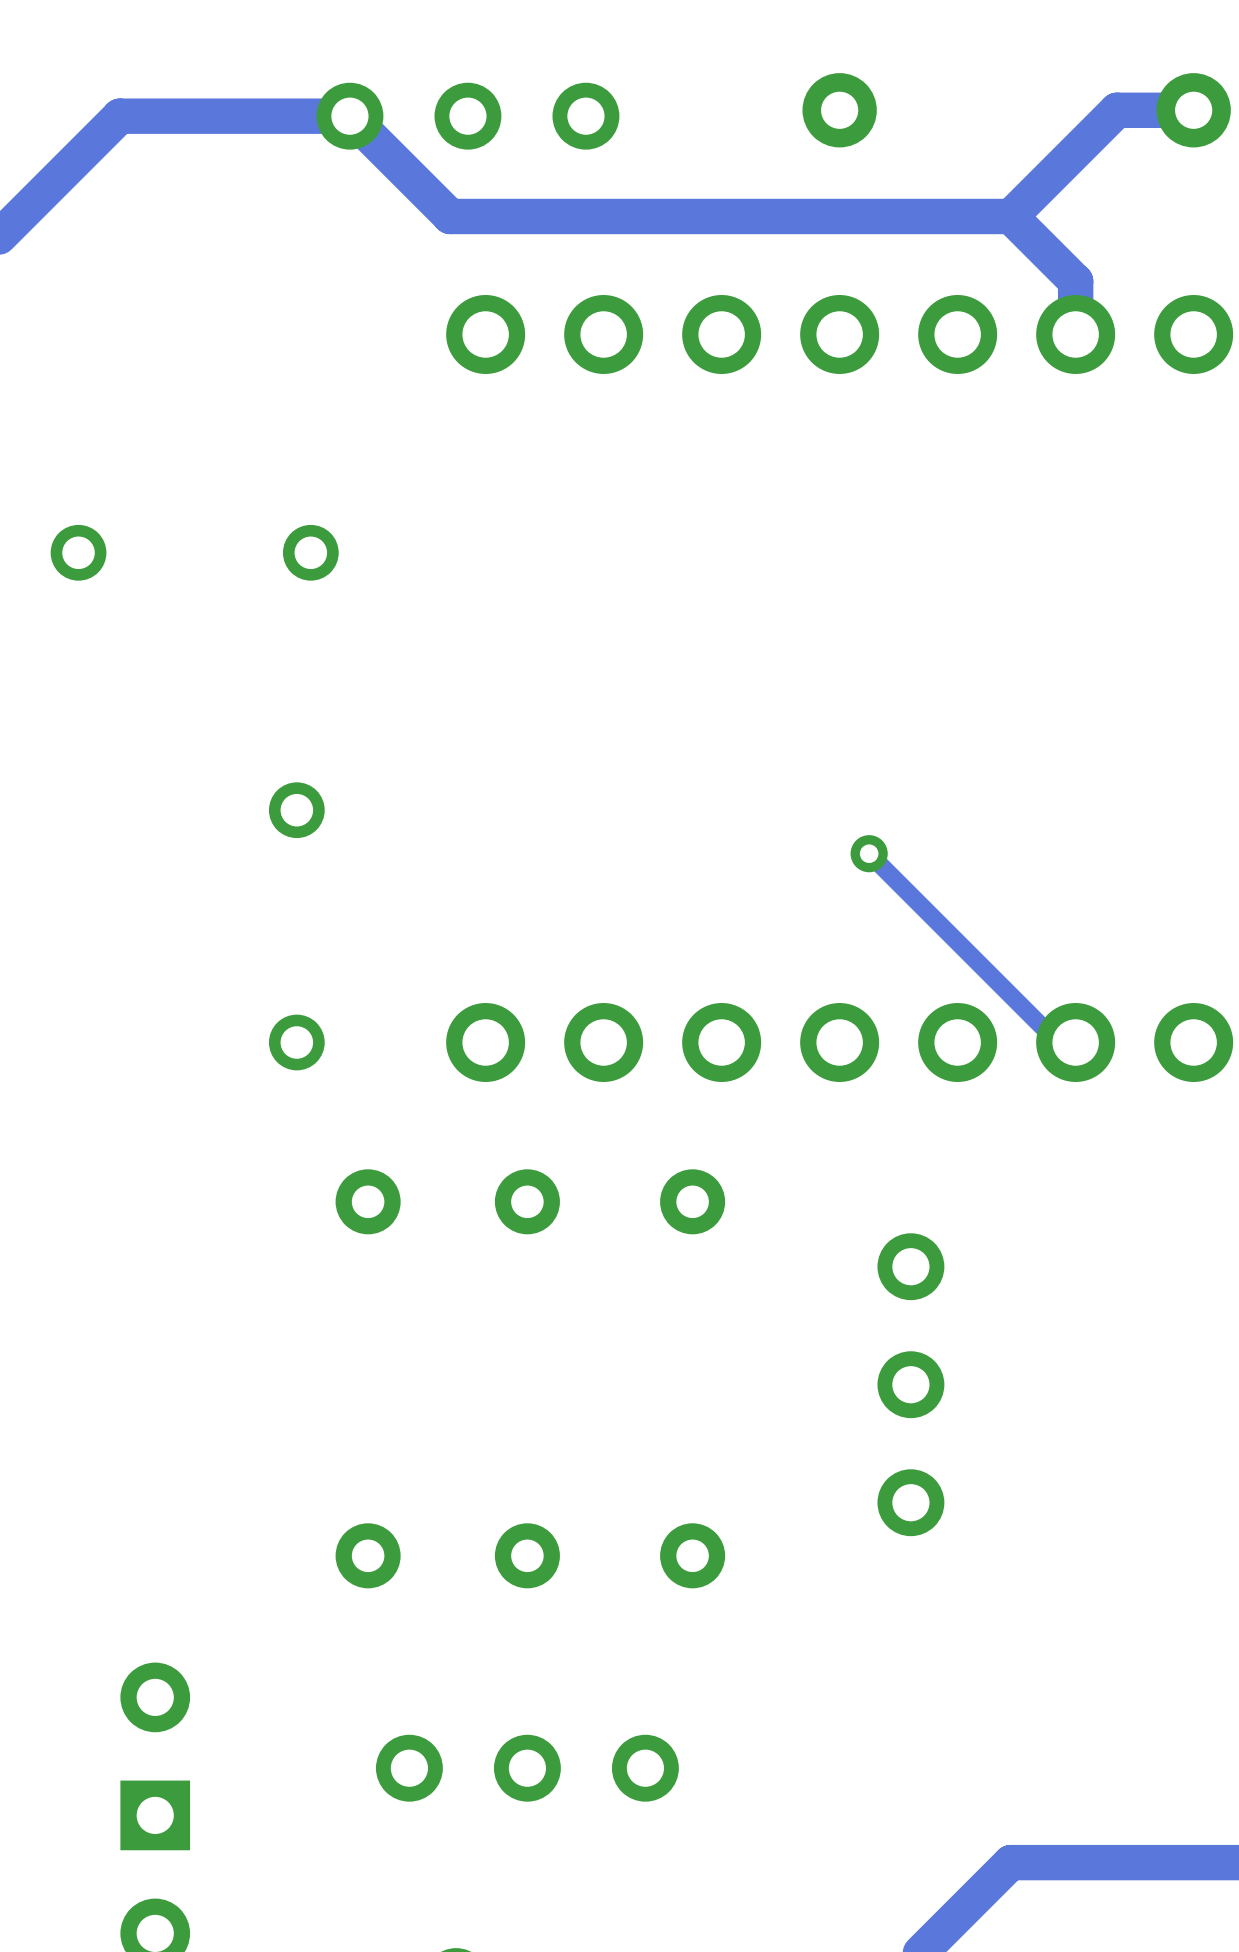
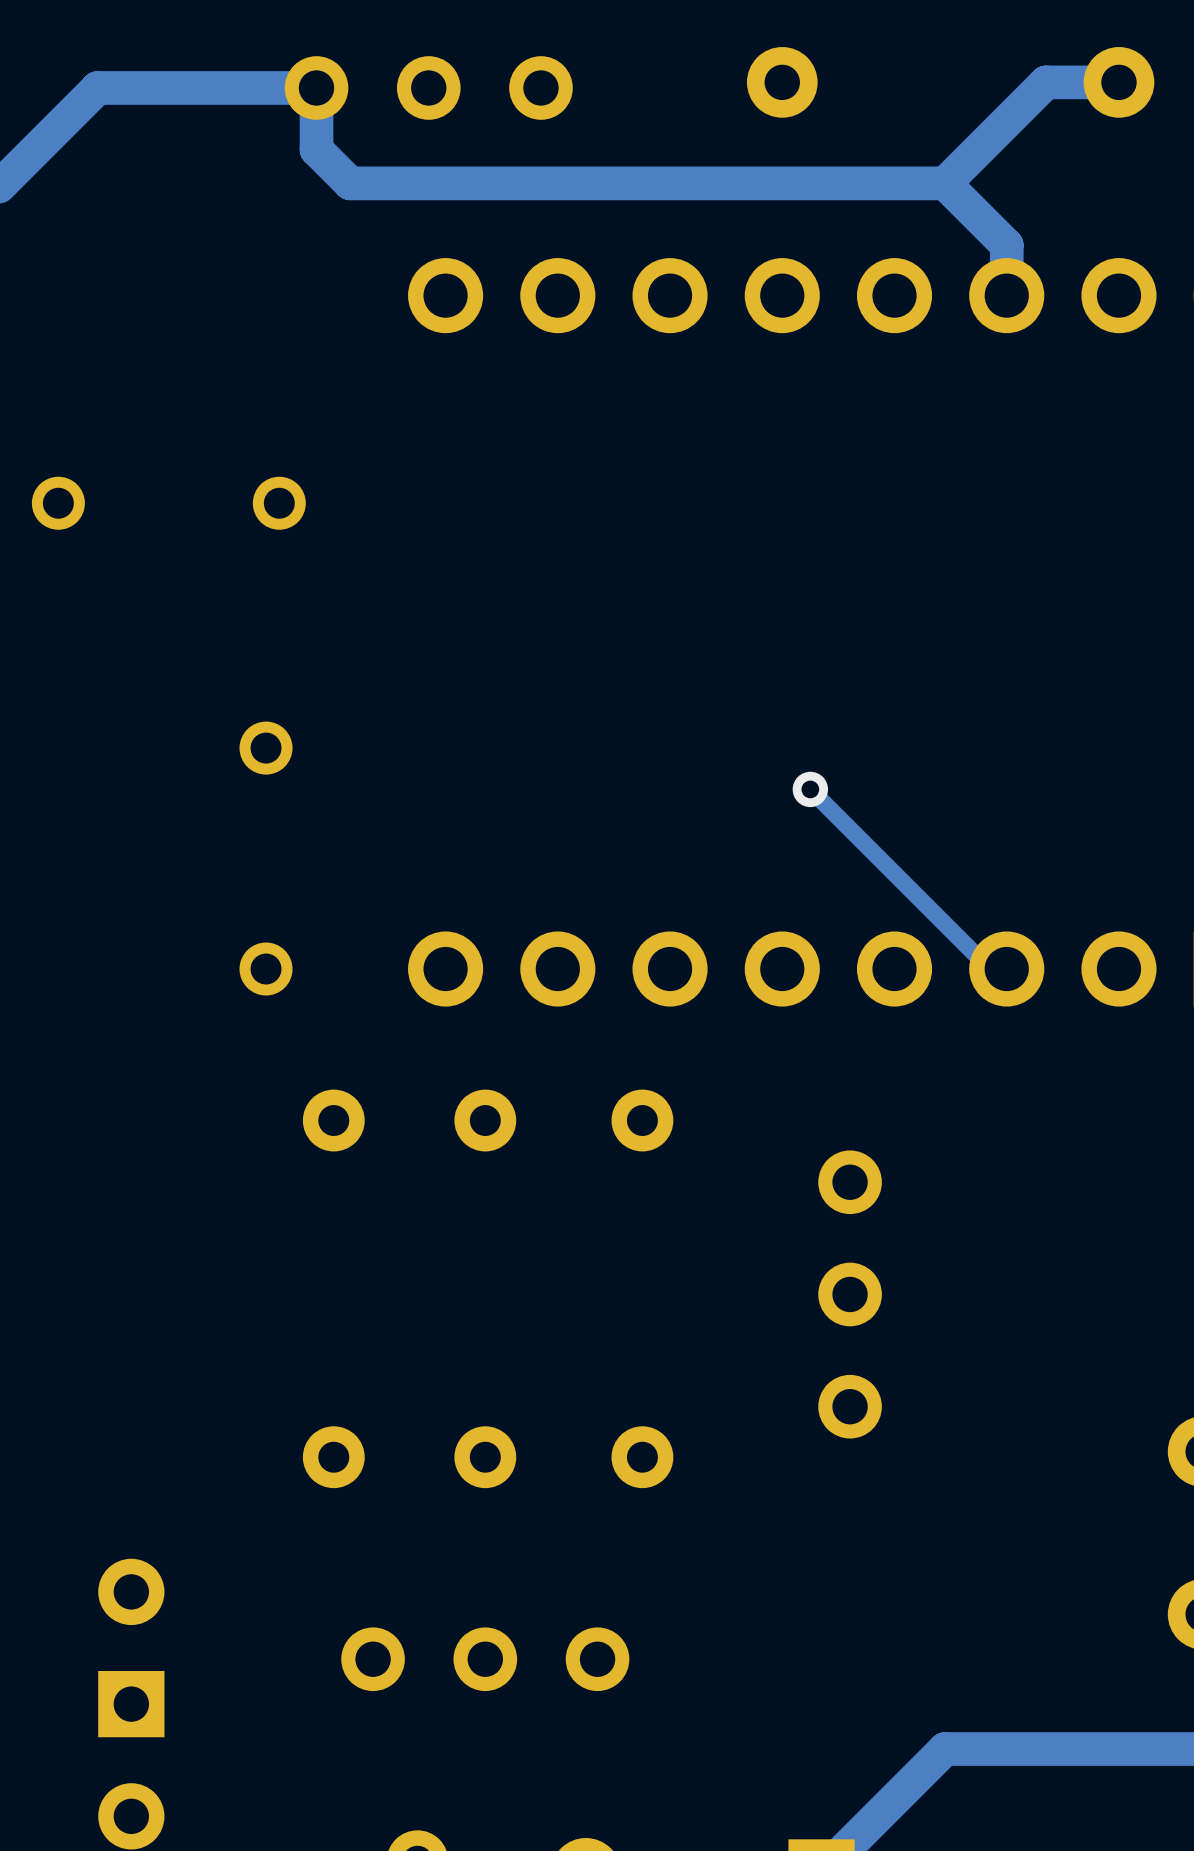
track: (349, 116) (450, 216) -> (316, 87) (316, 149) (350, 183) (411, 183)

